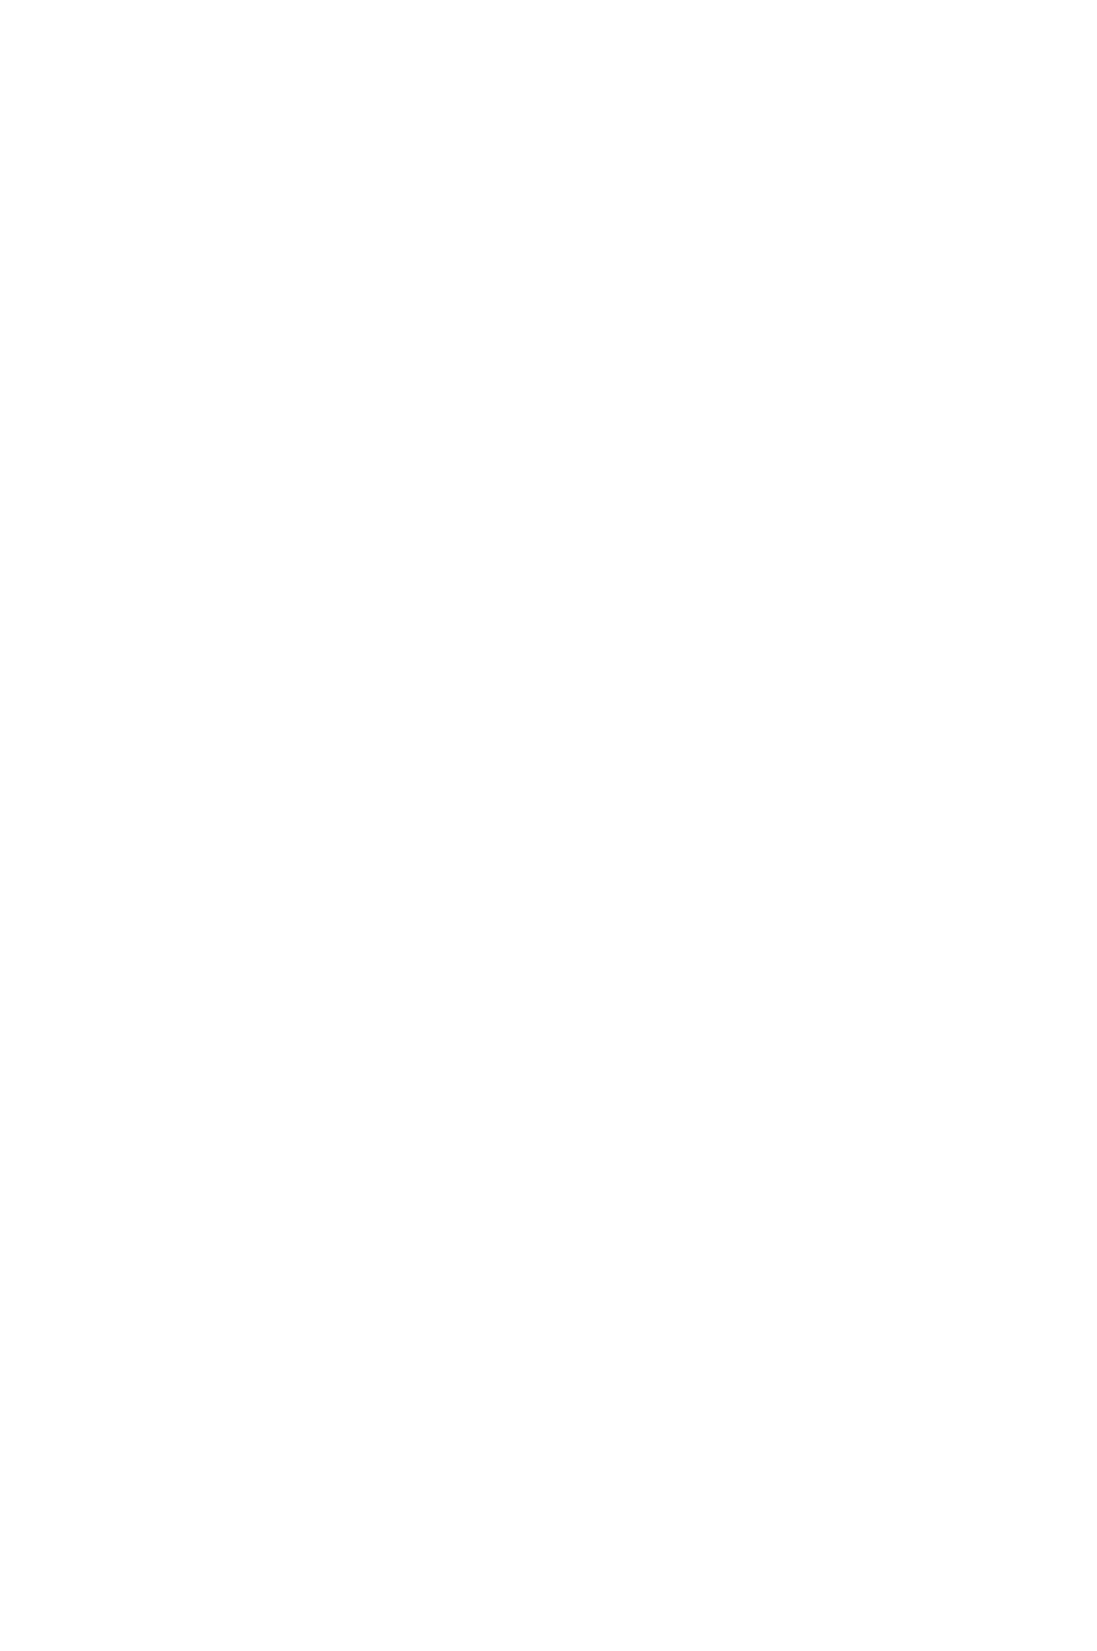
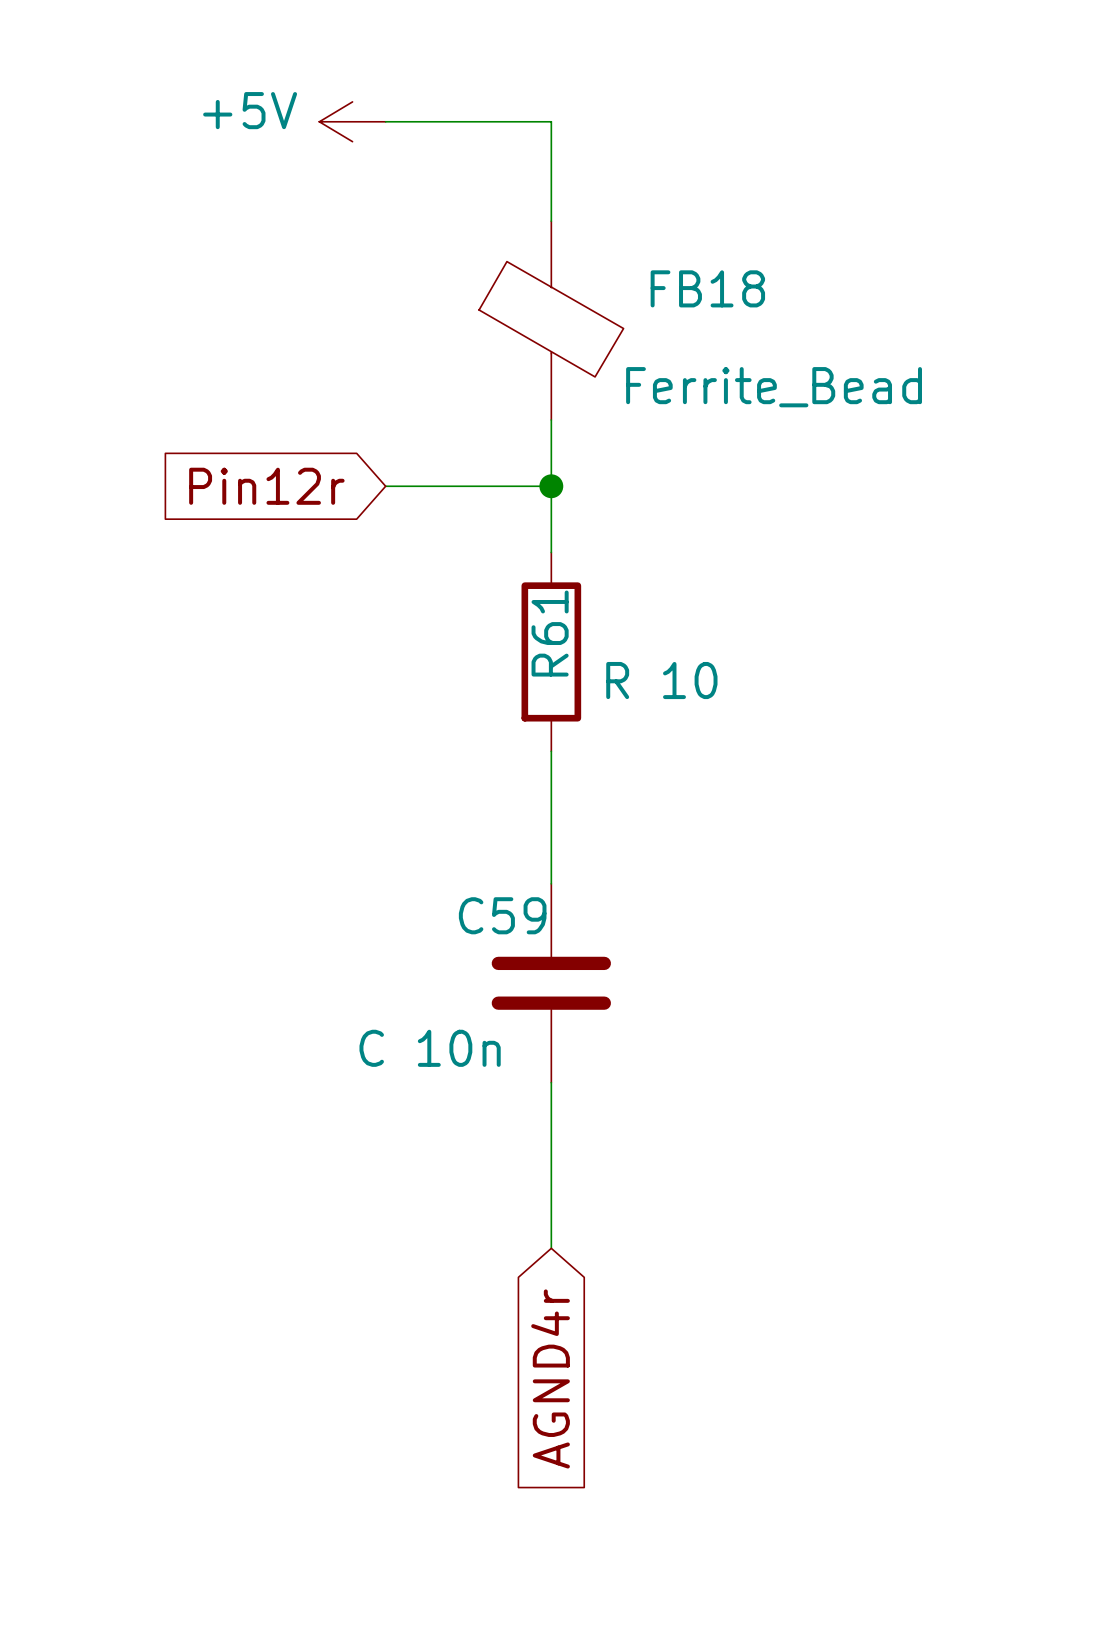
power symbol: none -> +5V (352, 121)
wire: none -> (385, 121) (551, 121) (551, 221)
FB18: none -> Ferrite_Bead (551, 320)
wire: none -> (551, 419) (551, 552)
global label: none -> Pin12r (266, 486)
wire: none -> (385, 486) (551, 486)
junction: none -> (551, 486)
R61: none -> R 10 (551, 651)
wire: none -> (551, 751) (551, 883)
C59: none -> C 10n (551, 983)
wire: none -> (551, 1082) (551, 1248)
global label: none -> AGND4r (550, 1378)

